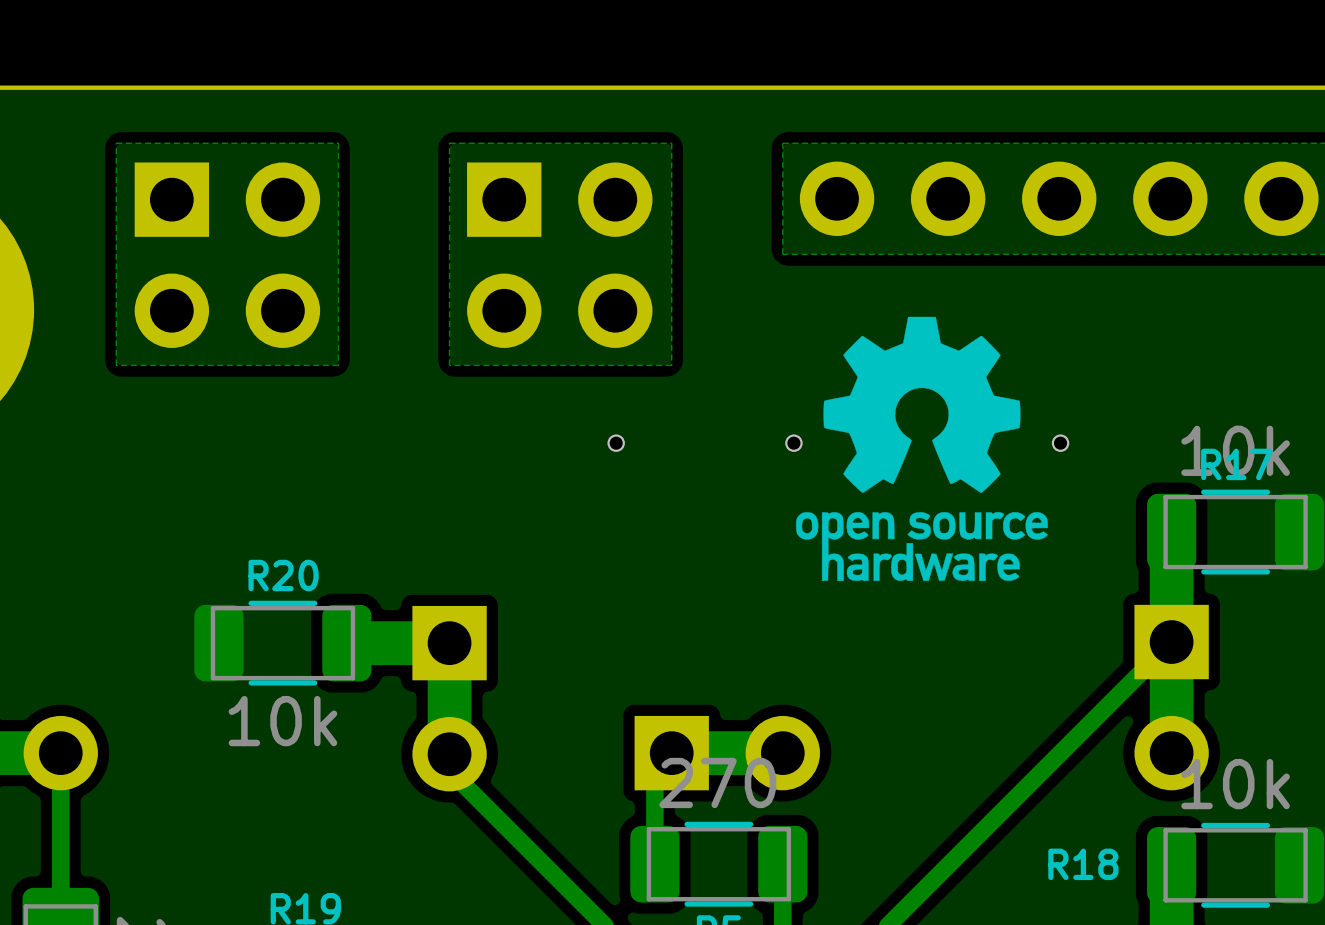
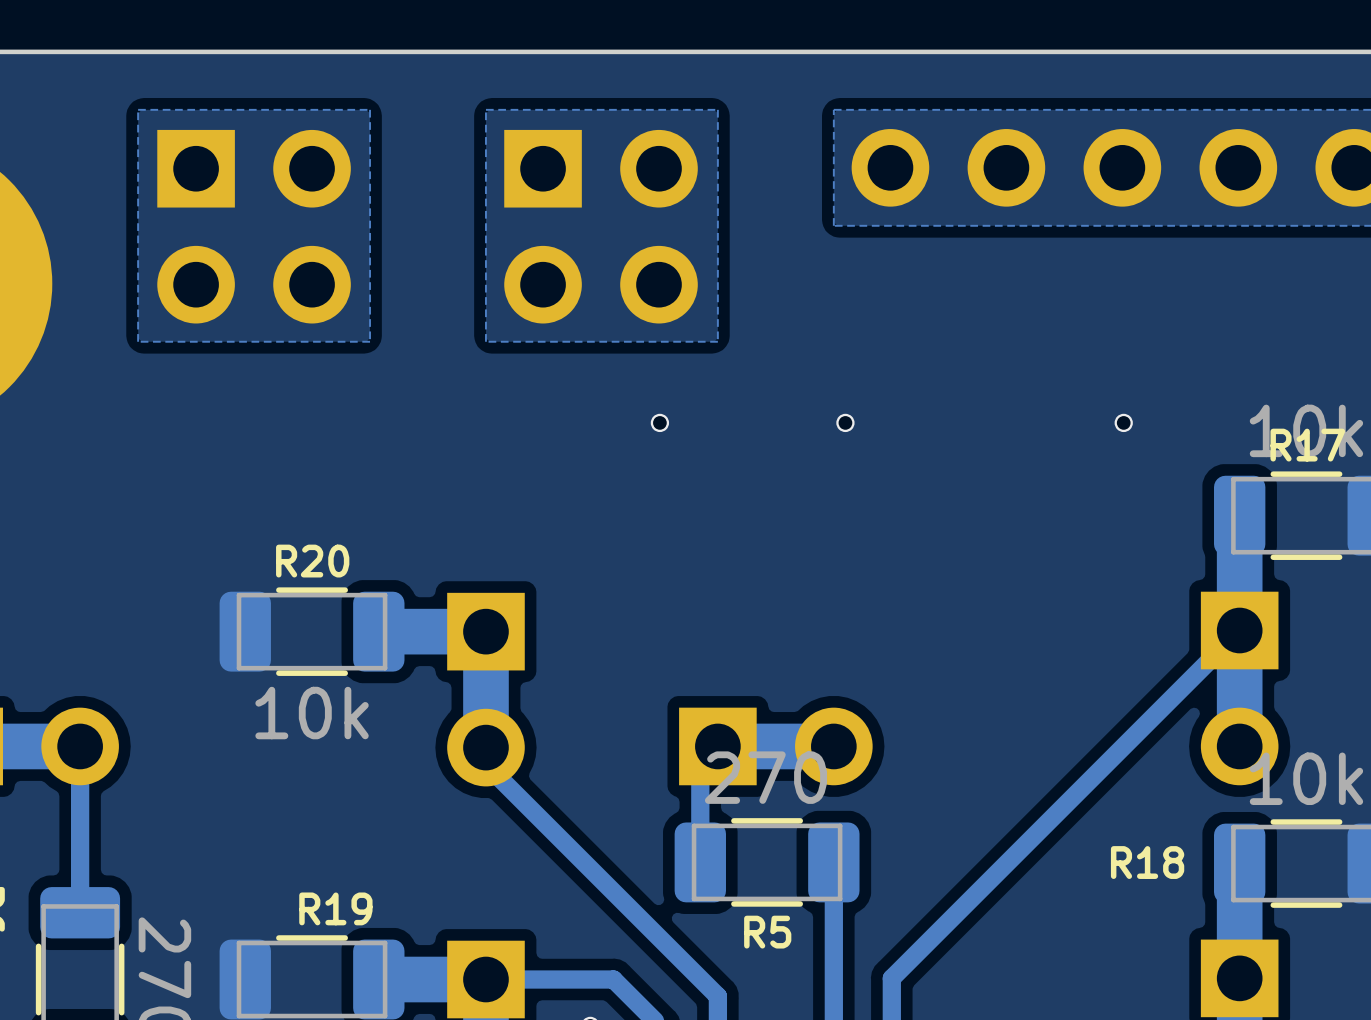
drawing: [796, 316, 1048, 581] -> none

